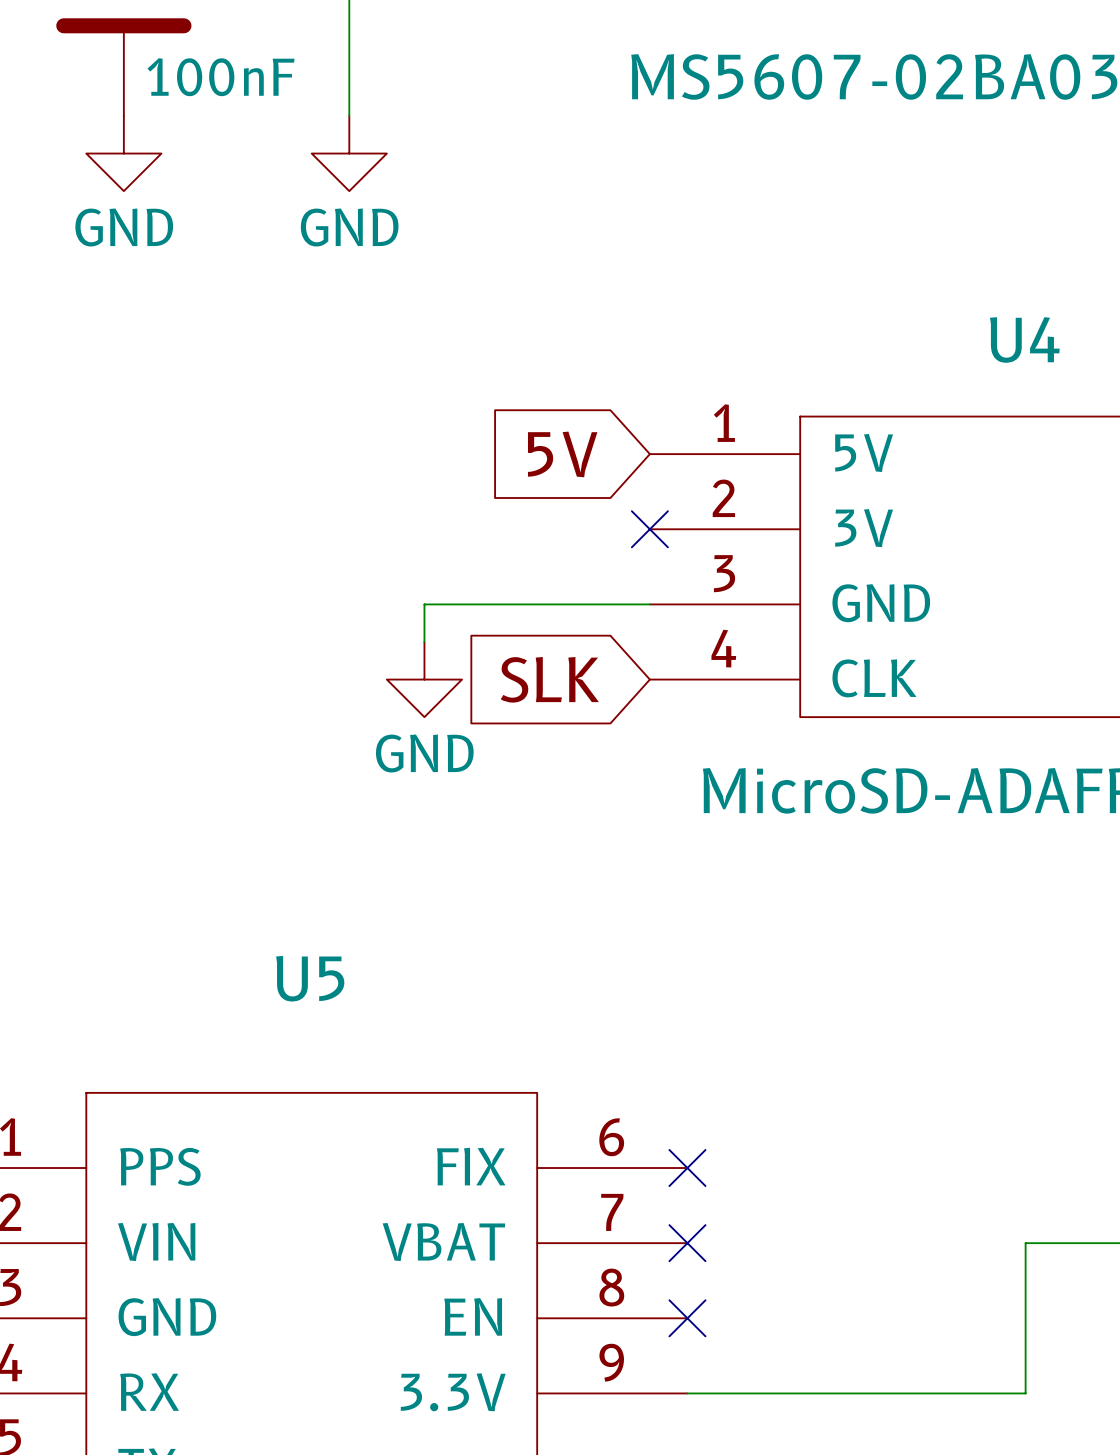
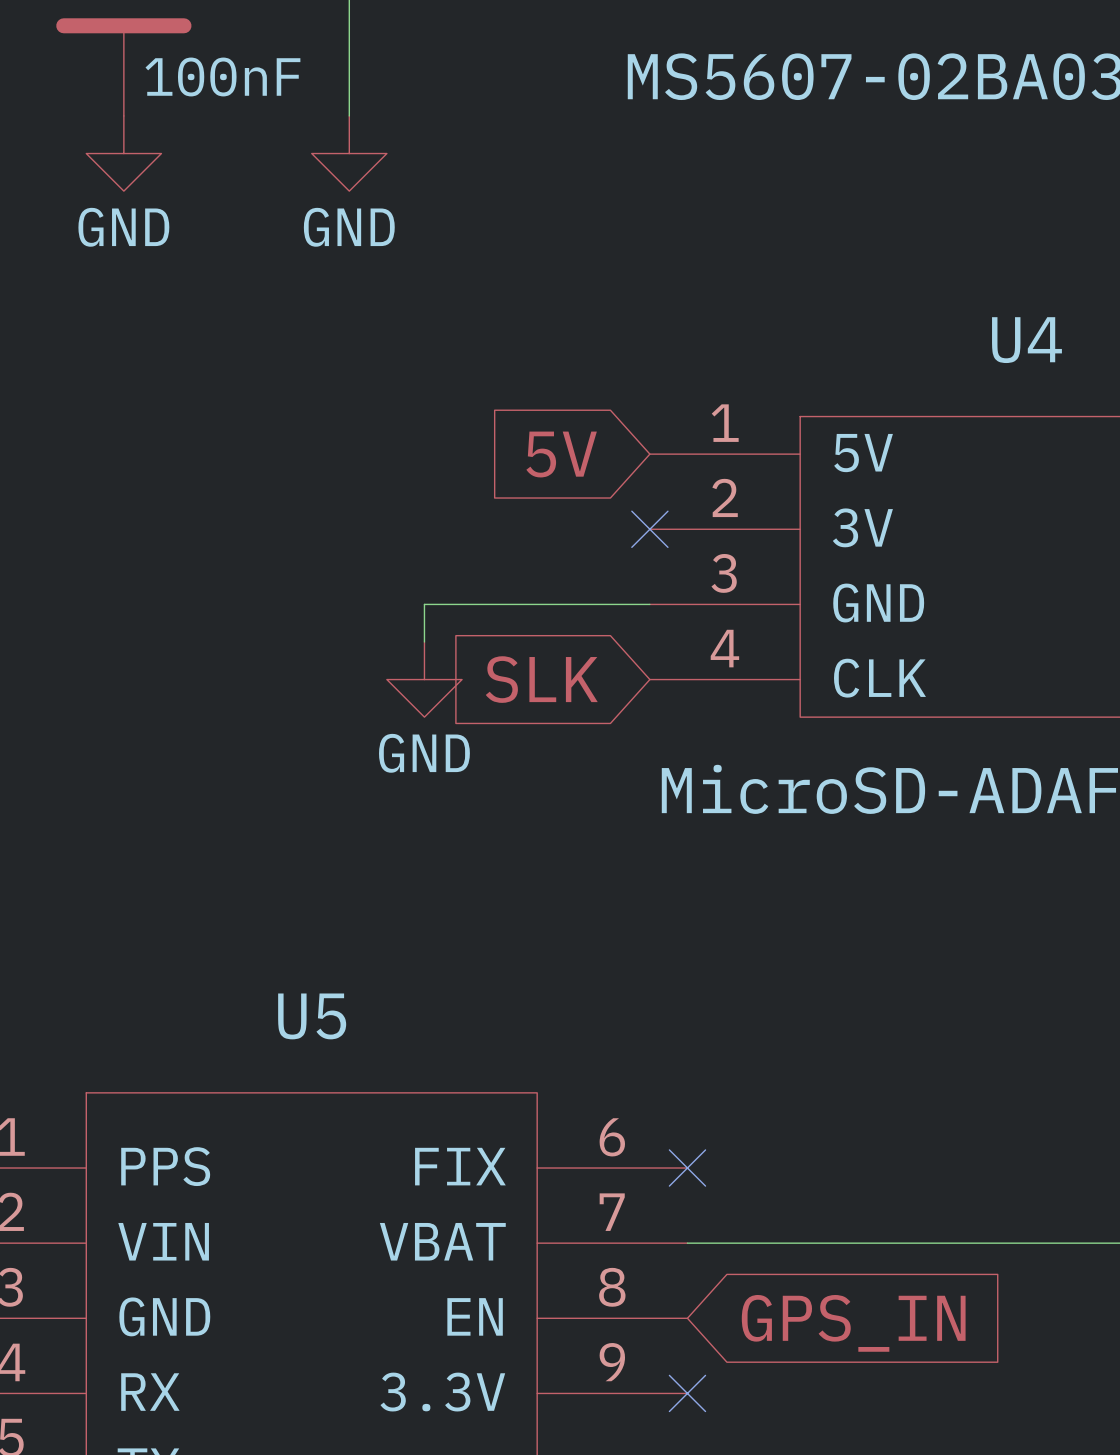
U5 name position: U5 (310, 978) -> U5 (312, 1016)
no-connect mark: (687, 1243) -> none
wire: (1025, 1243) (1025, 1393) (687, 1393) -> (1025, 1243) (687, 1243)
no-connect mark: (687, 1318) -> none
global label: none -> GPS_IN (853, 1323)
no-connect mark: none -> (687, 1393)

